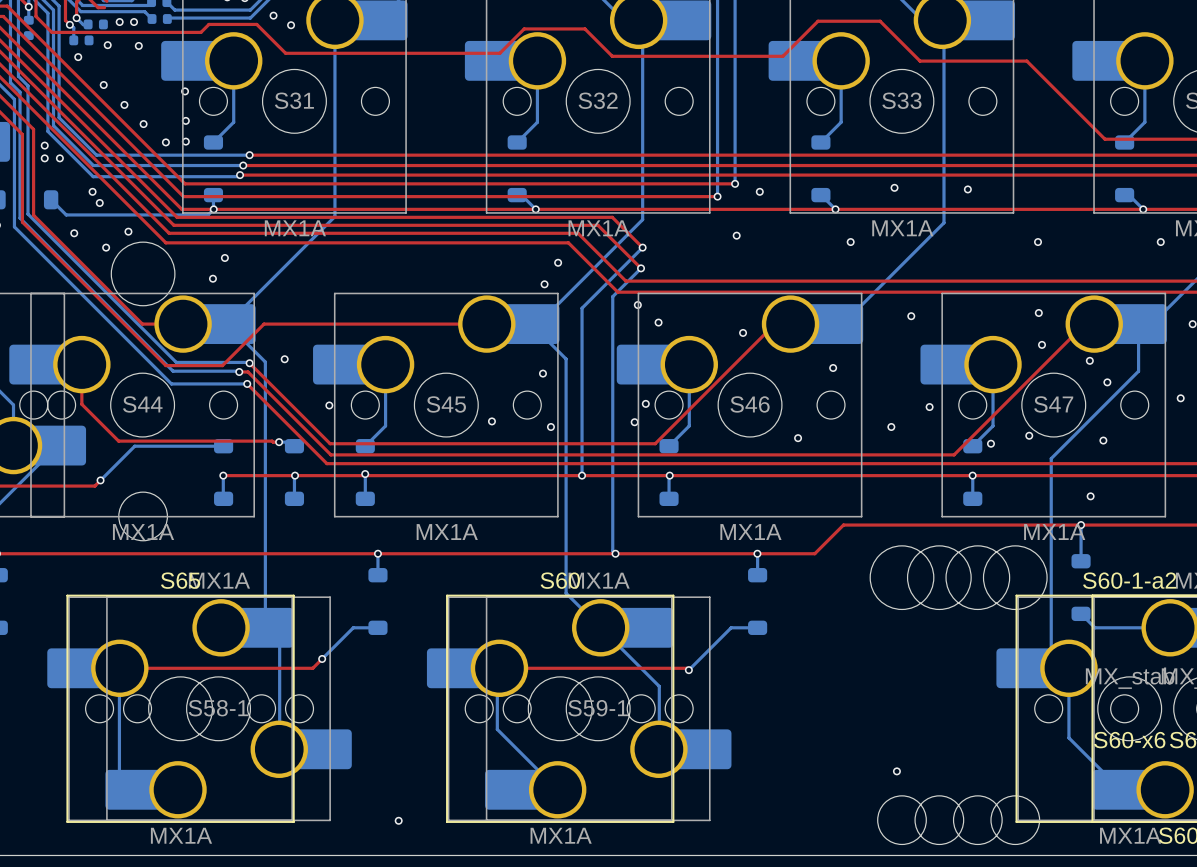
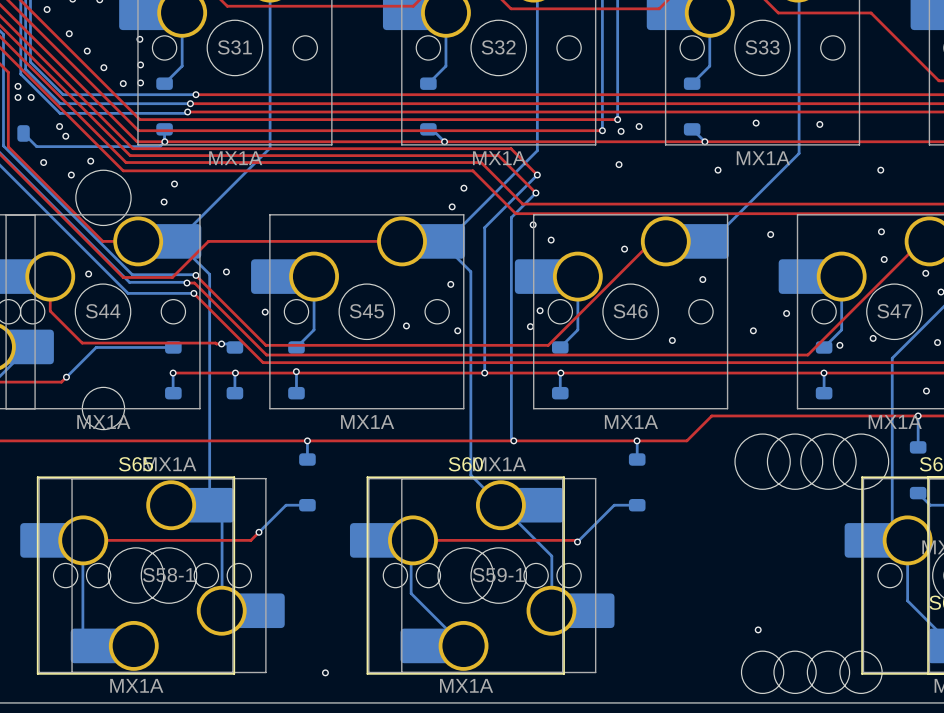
via: none -> (621, 131)
via: none -> (88, 274)

